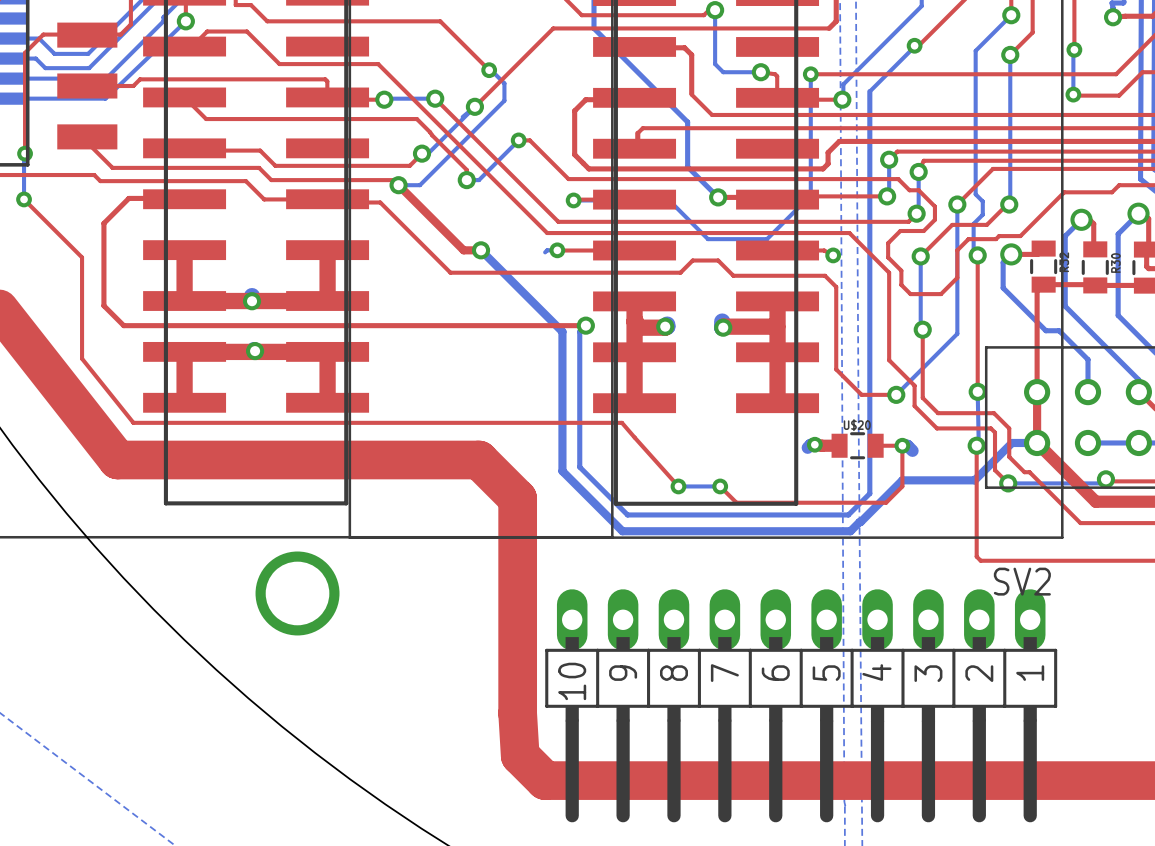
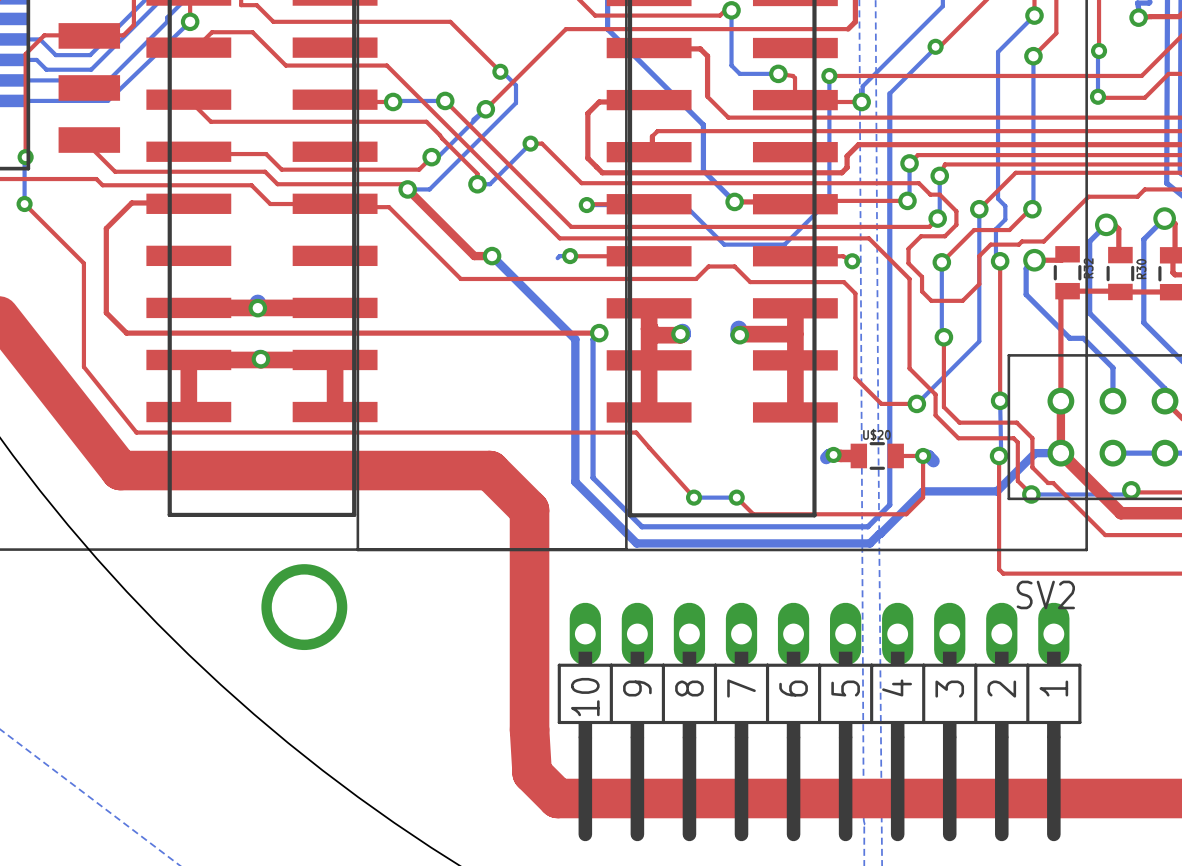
top track: (87, 86) (133, 86) (140, 79) (325, 79) (327, 81) (327, 97) (329, 99) -> none
top track: (184, 250) (184, 301) -> none
top track: (327, 250) (327, 301) -> none

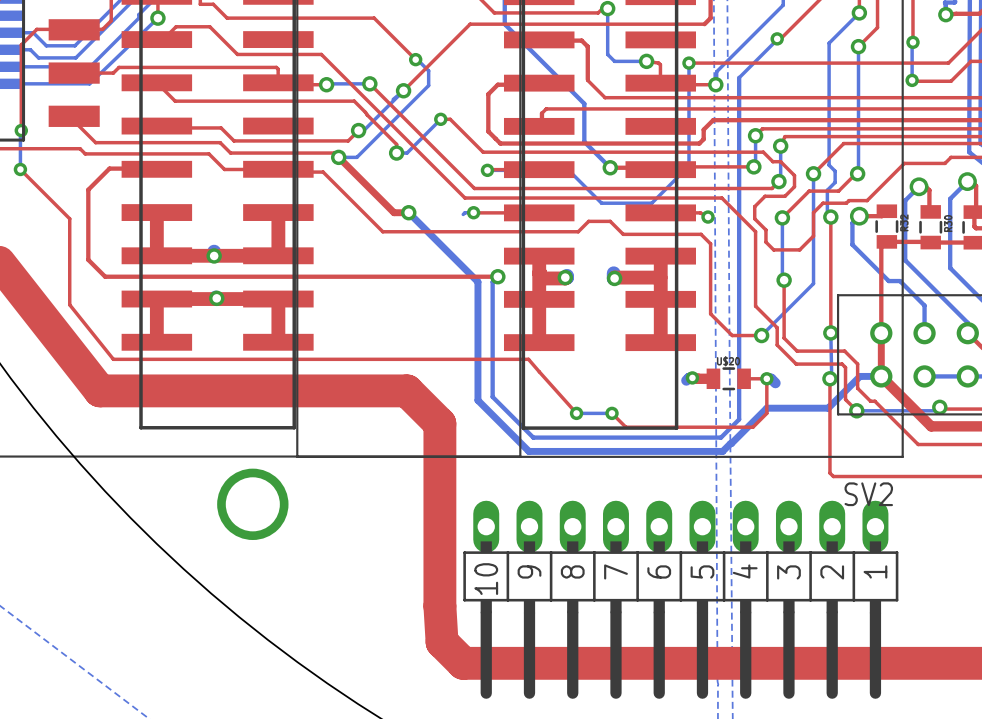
top track: none -> (74, 73) (113, 73) (119, 67) (276, 67) (278, 69) (278, 82) (280, 84)
top track: none -> (156, 212) (156, 255)
top track: none -> (278, 212) (278, 255)

